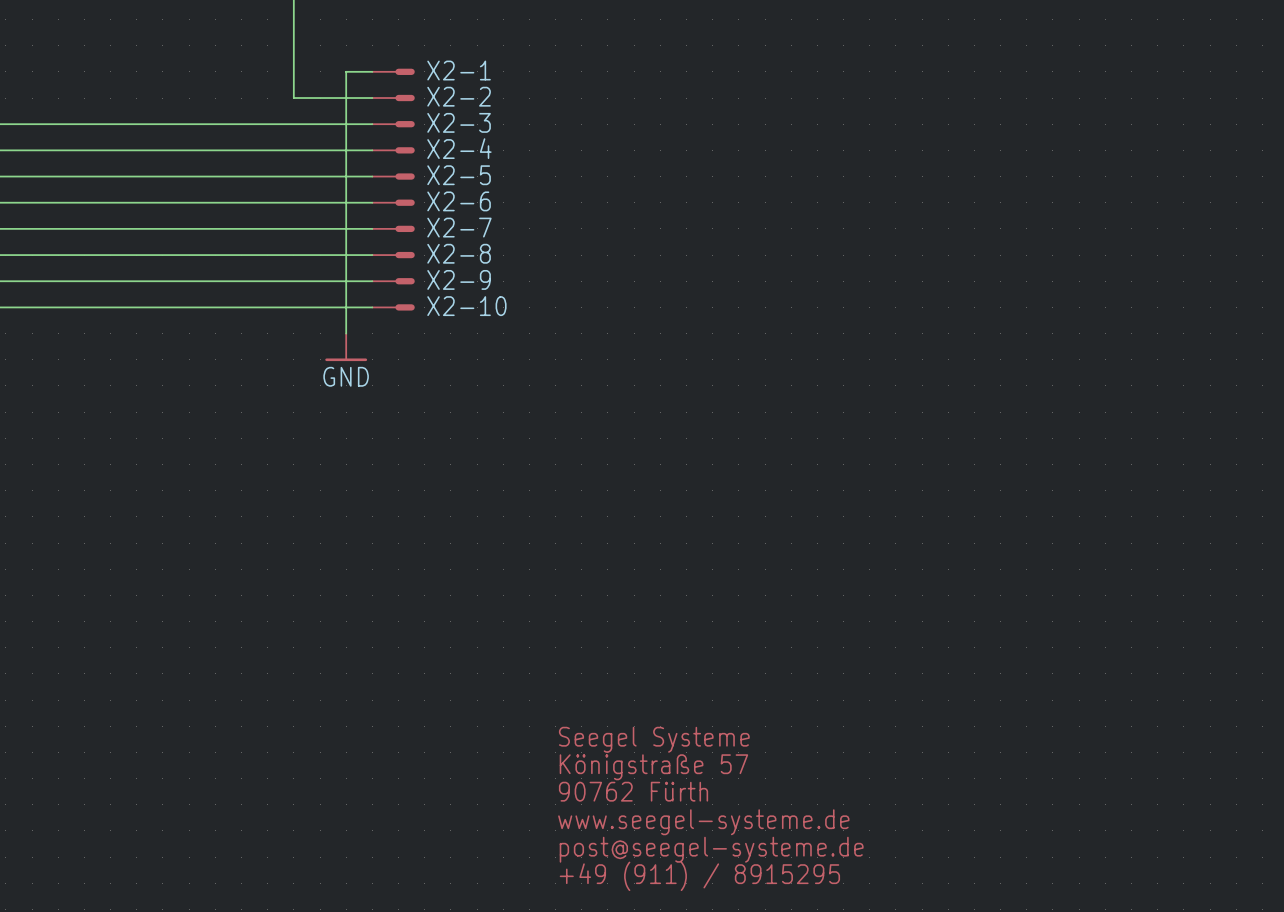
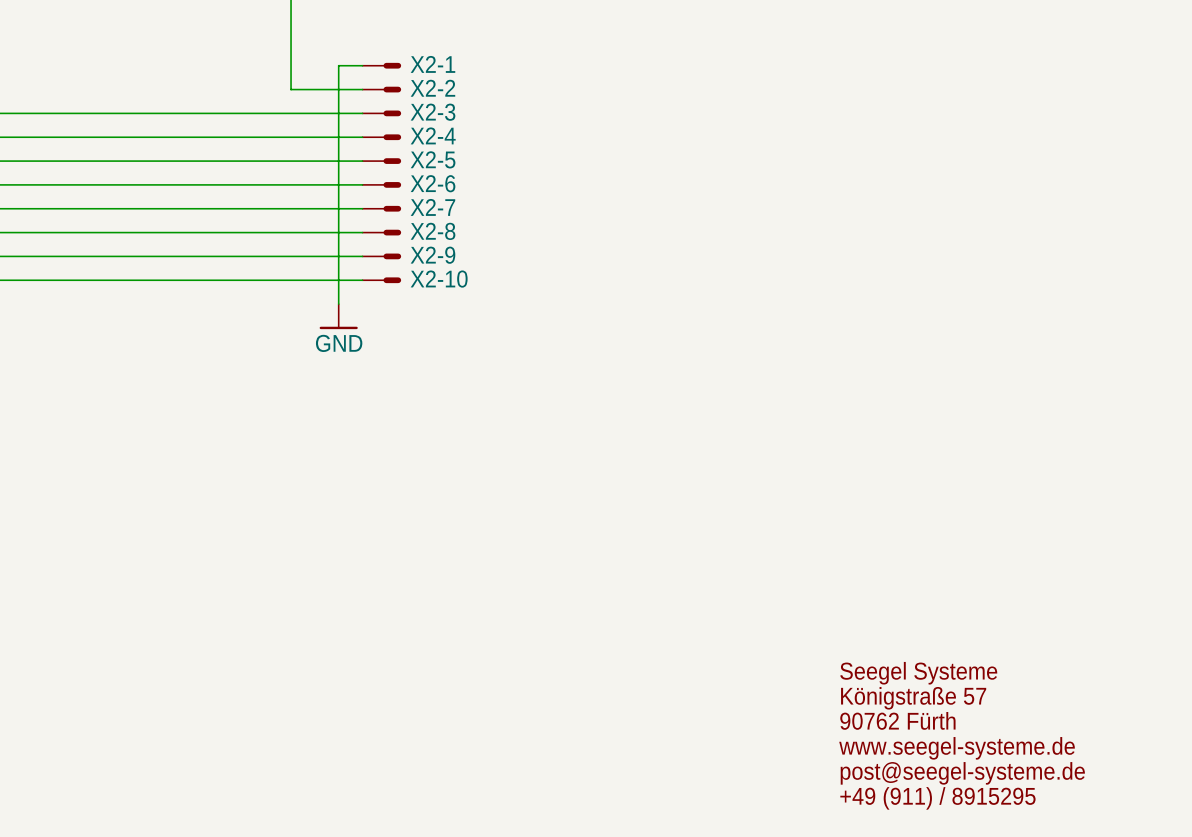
text: Seegel Systeme (654, 739) -> none
text: none -> Seegel Systeme (918, 673)
text: Königstraße 57 (653, 767) -> none
text: none -> Königstraße 57 (913, 698)
text: 90762 Fürth (633, 791) -> none
text: none -> 90762 Fürth (897, 720)
text: www.seegel-systeme.de (703, 822) -> none
text: none -> www.seegel-systeme.de (957, 748)
text: post@seegel-systeme.de (711, 849) -> none
text: none -> post@seegel-systeme.de (962, 773)
text: +49 (911) / 8915295 (699, 876) -> none
text: none -> +49 (911) / 8915295 (937, 798)

